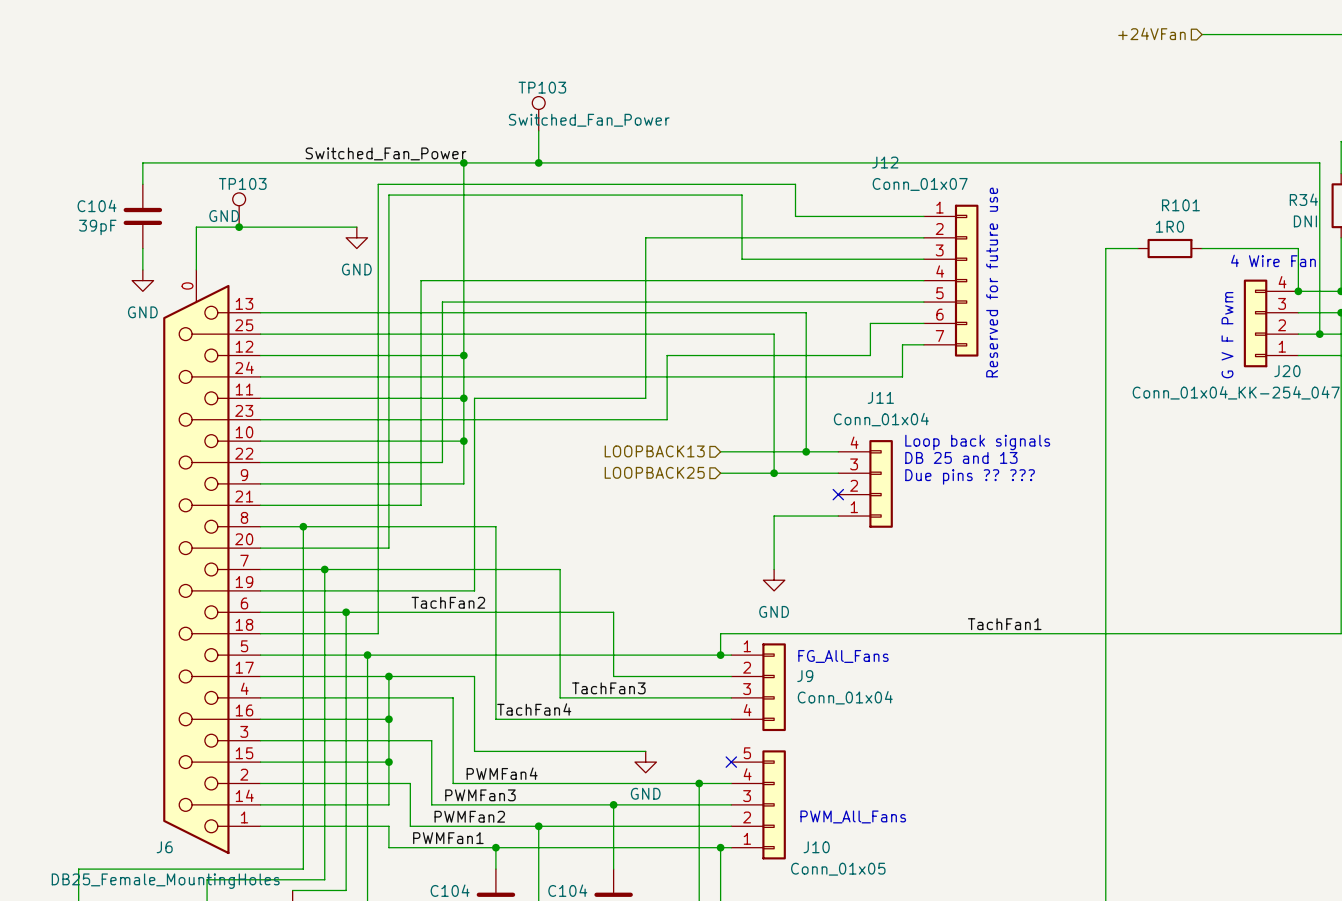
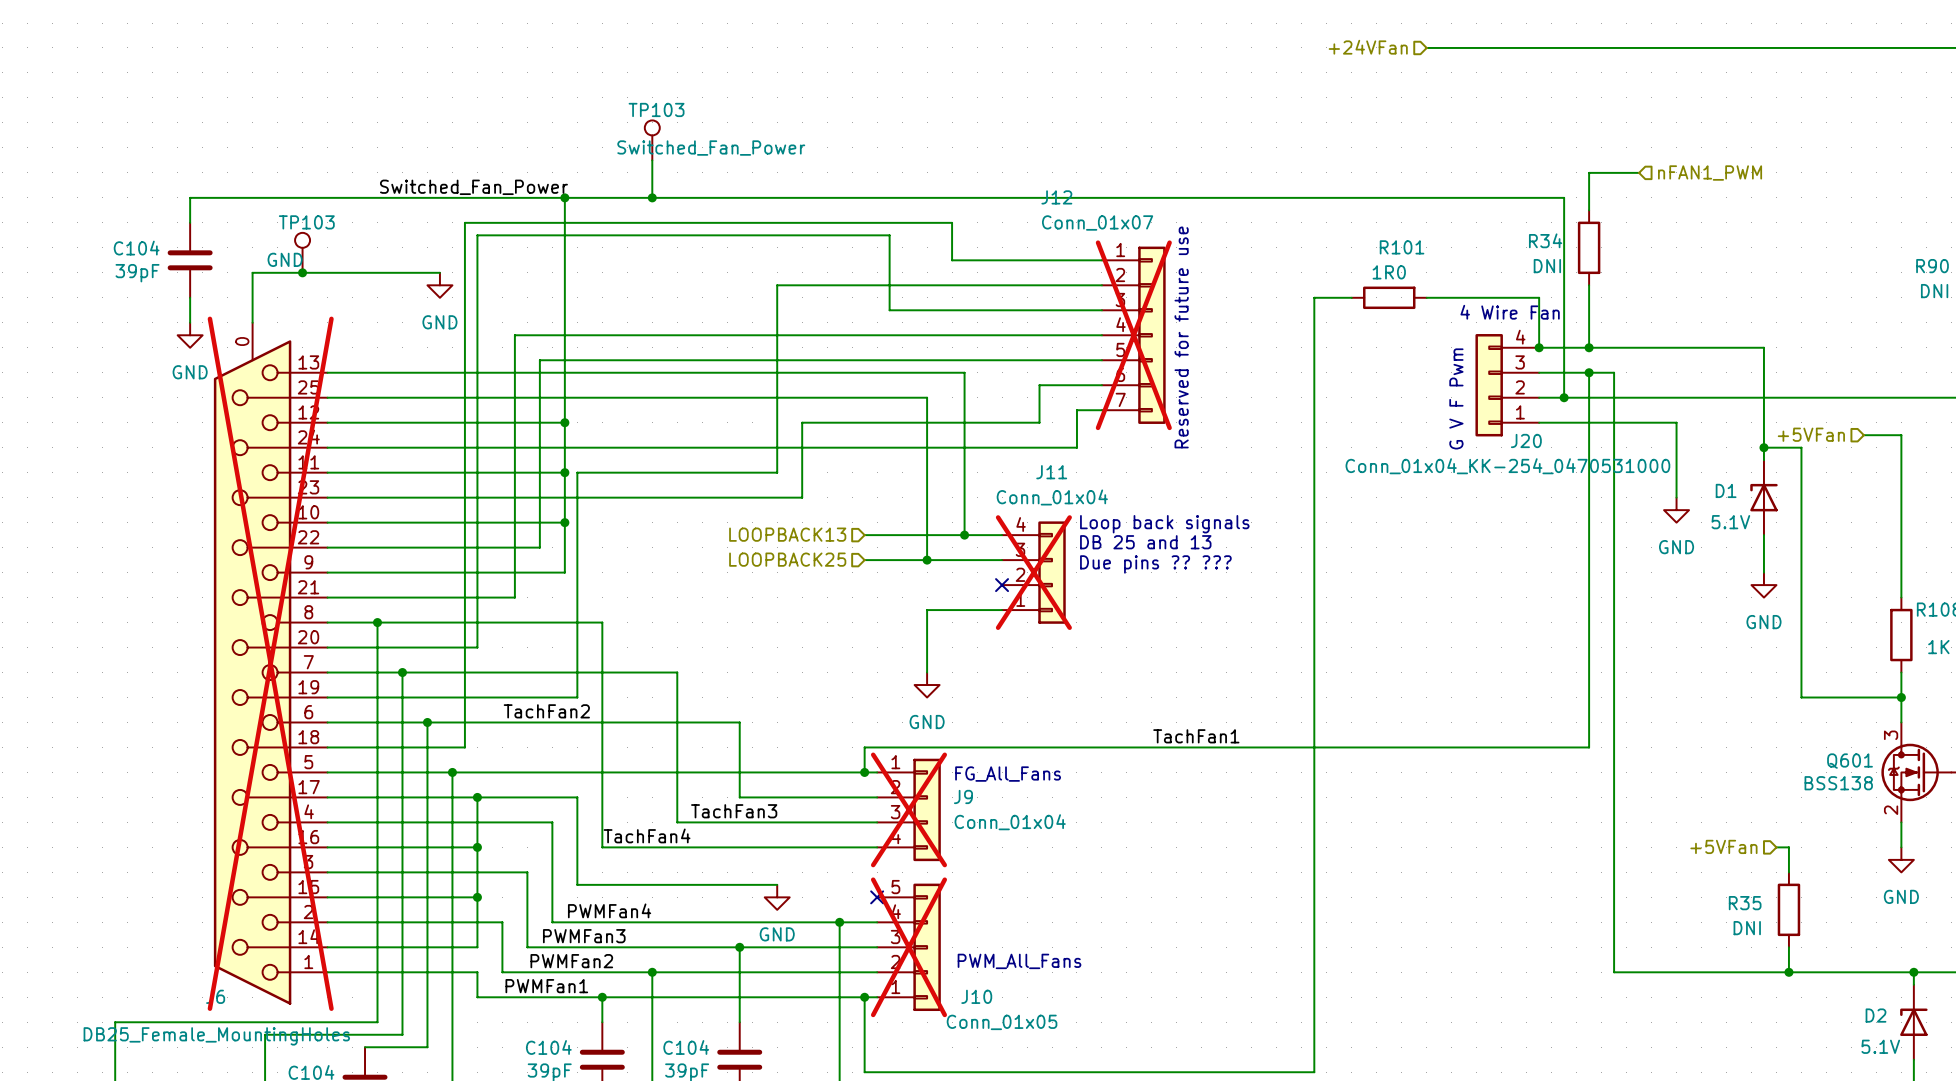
J12 do-not-place cross: none -> (1133, 335)
J11 do-not-place cross: none -> (1033, 572)
J6 do-not-place cross: none -> (270, 663)
J9 do-not-place cross: none -> (908, 809)
J10 do-not-place cross: none -> (908, 947)

